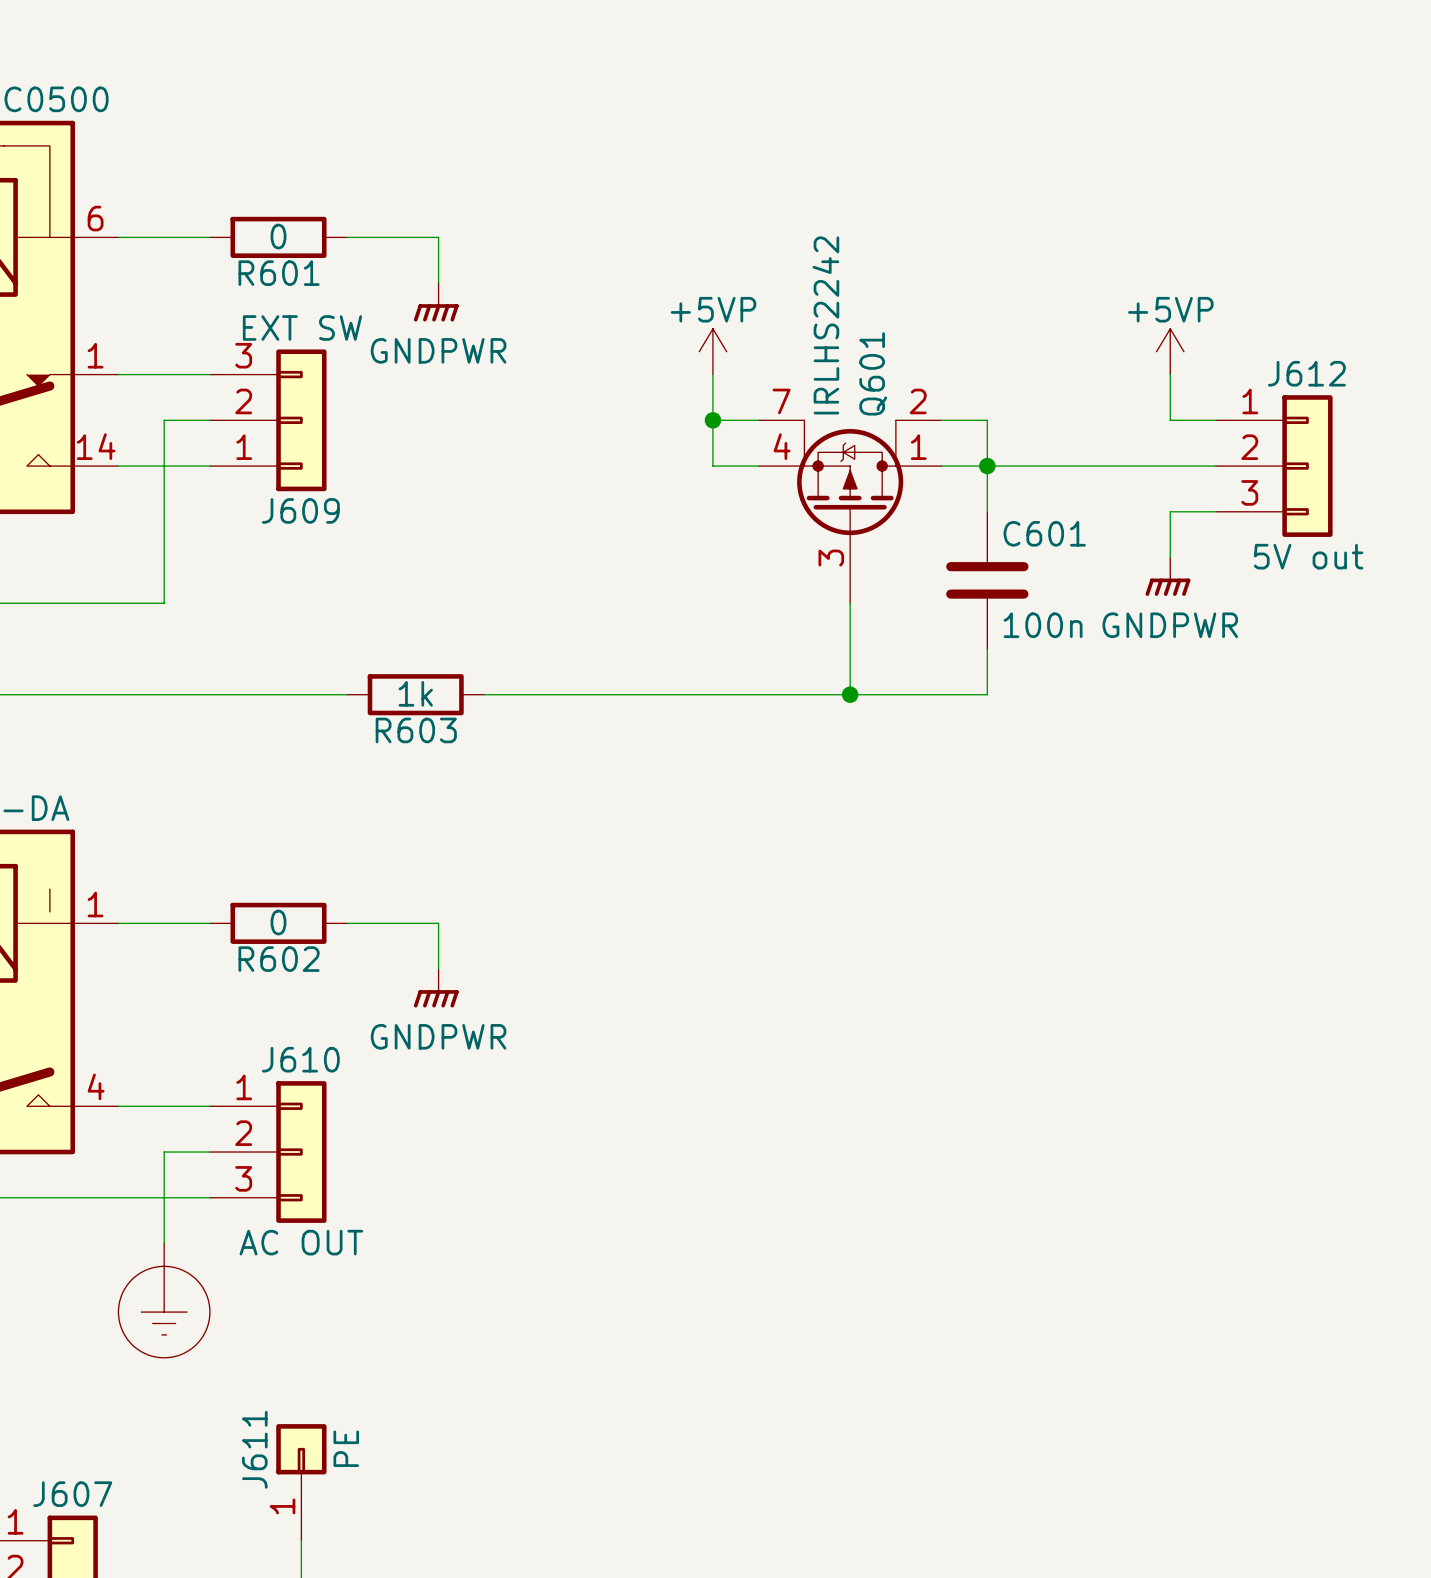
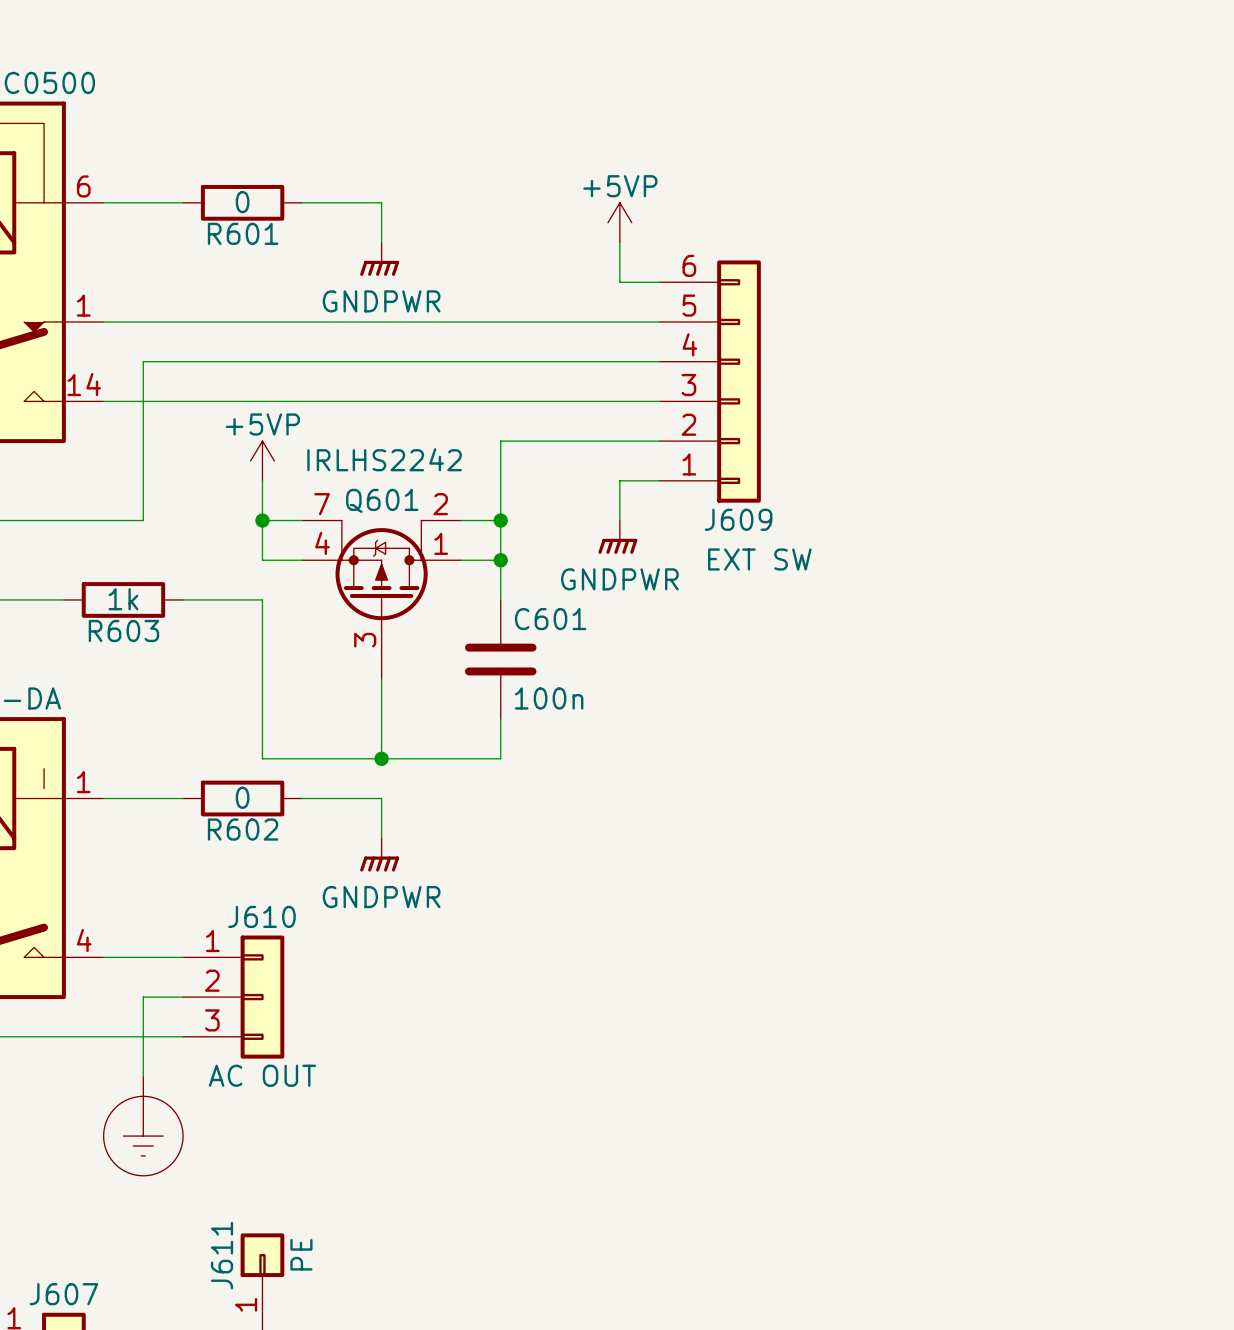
wire: none -> (619, 242) (619, 282) (659, 282)
Q601 value rotation: 0° (825, 325) -> 90° clockwise (384, 459)
J609 value position: EXT SW (302, 328) -> EXT SW (759, 559)
J609 symbol: [209, 349, 327, 492] -> [659, 260, 761, 503]
power symbol position: +5VP (712, 351) -> +5VP (619, 222)
power symbol: +5VP (1170, 351) -> none
Q601 name rotation: 0° (873, 373) -> 90° clockwise (382, 500)
wire: none -> (183, 321) (659, 321)
wire: (712, 374) (712, 466) -> (183, 401) (619, 401)
wire: (1170, 374) (1170, 420) (1215, 420) -> none
wire: none -> (183, 361) (619, 361)
junction: (712, 420) -> none
wire: (941, 420) (987, 420) (987, 511) -> none
wire: (941, 466) (1215, 466) -> none
junction: (987, 466) -> none
J612: 5V out (1274, 466) -> none
J609 name position: J609 (300, 510) -> J609 (738, 519)
wire: none -> (659, 441) (500, 441) (500, 599)
Q601 position: (850, 511) -> (381, 599)
wire: (1215, 511) (1170, 511) (1170, 557) -> none
power symbol: none -> +5VP (262, 460)
wire: none -> (262, 480) (262, 560) (302, 560)
wire: none -> (659, 480) (619, 480) (619, 520)
power symbol: GNDPWR (1167, 576) -> none
C601 position: (987, 580) -> (500, 659)
wire: none -> (262, 520) (302, 520)
junction: none -> (262, 520)
wire: none -> (461, 520) (500, 520)
junction: none -> (500, 520)
wire: (850, 603) (850, 694) -> none
power symbol: none -> GNDPWR (617, 537)
wire: none -> (461, 560) (500, 560)
junction: none -> (500, 560)
wire: (987, 648) (987, 694) (484, 694) -> none
wire: (72, 694) (209, 694) -> none
wire: (301, 694) (347, 694) -> (262, 599) (262, 758) (500, 758) (500, 719)
R603 position: (415, 694) -> (123, 599)
junction: (850, 694) -> none
wire: none -> (381, 679) (381, 758)
junction: none -> (381, 758)

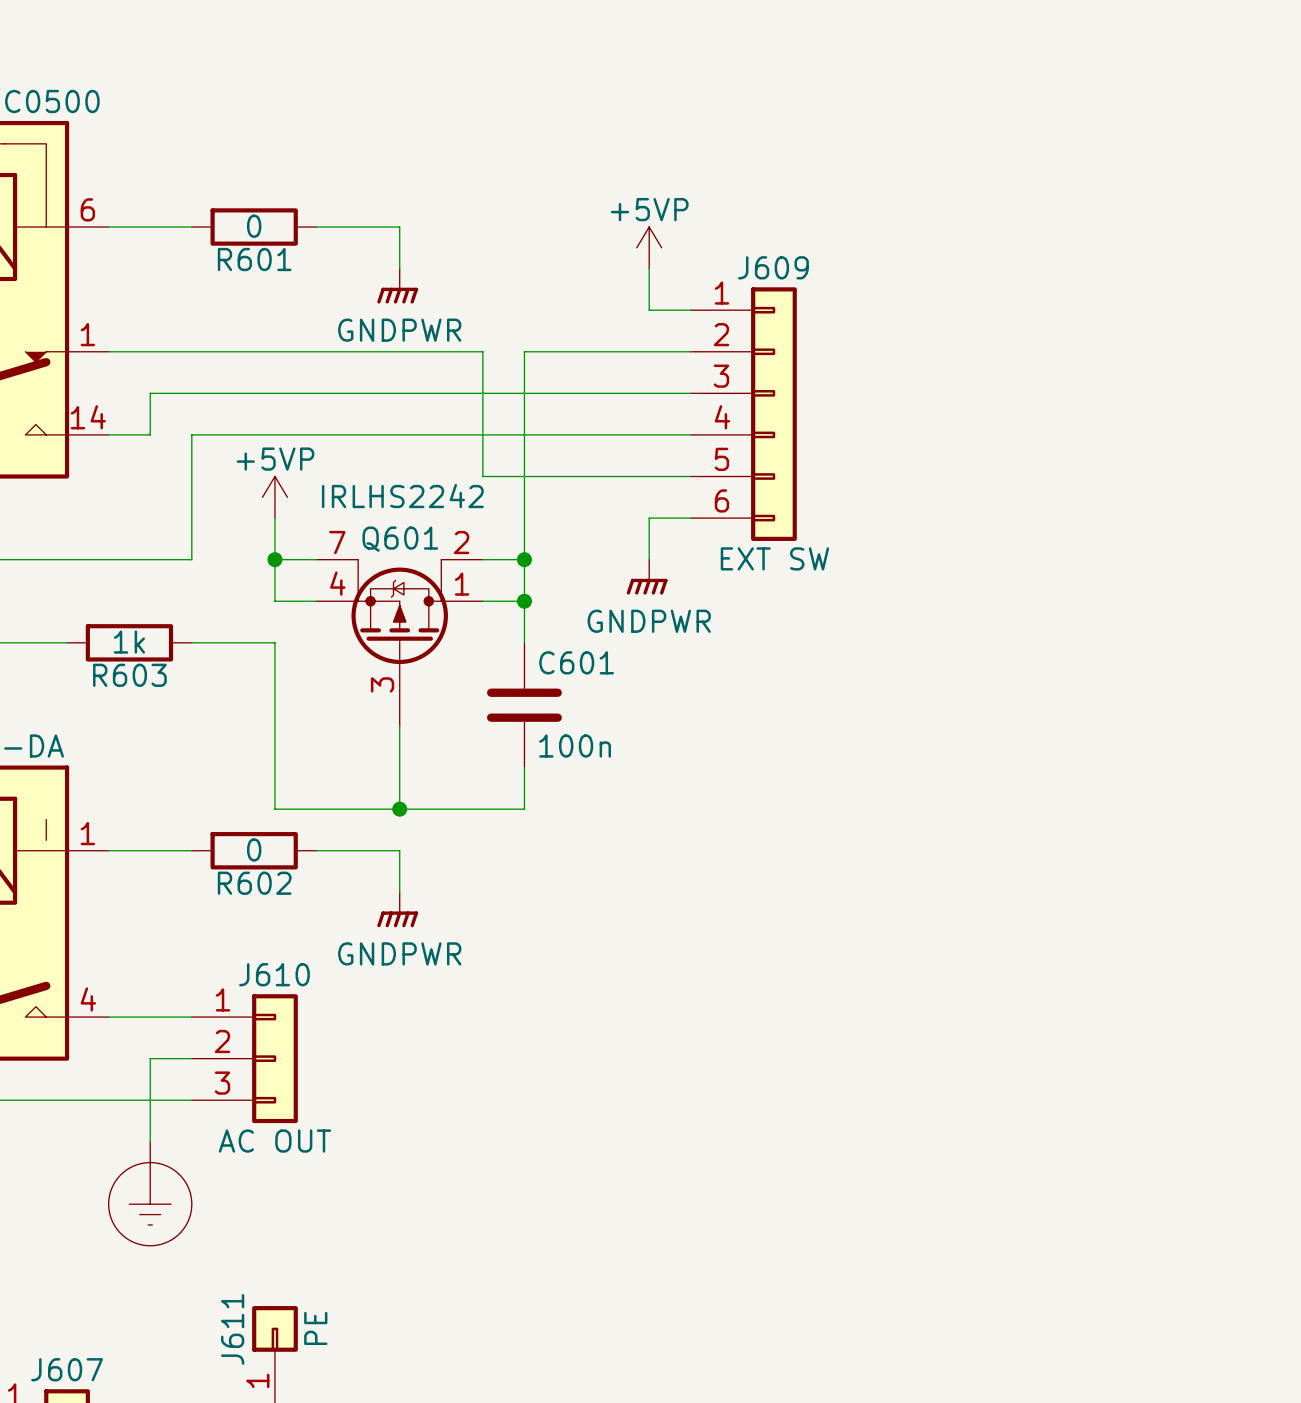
wire: (461, 321) (500, 321) -> (482, 351) (482, 476) (524, 476) (524, 351)
J609 flip: as is (739, 381) -> up-down (773, 414)
wire: (183, 401) (143, 401) (143, 520) -> (191, 434) (191, 559) (150, 559)
J609 value position: EXT SW (759, 559) -> EXT SW (774, 558)

